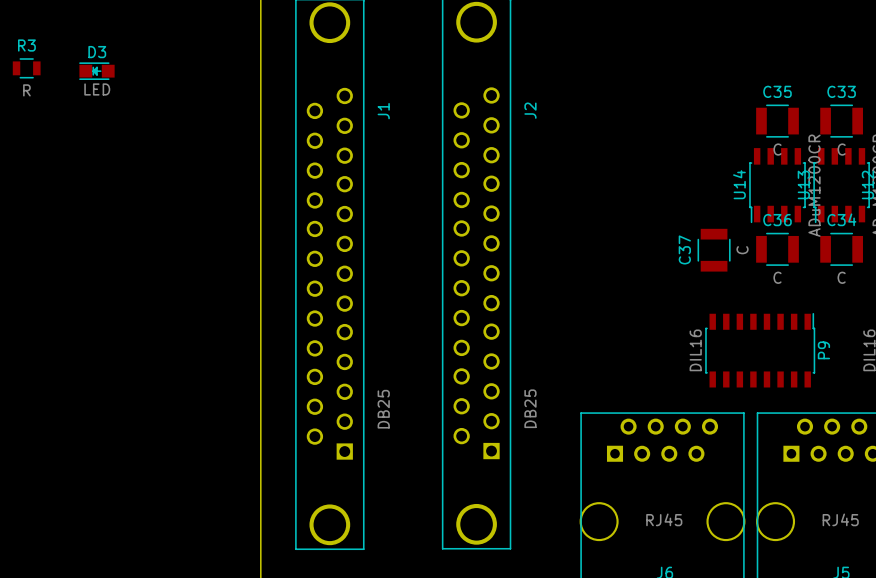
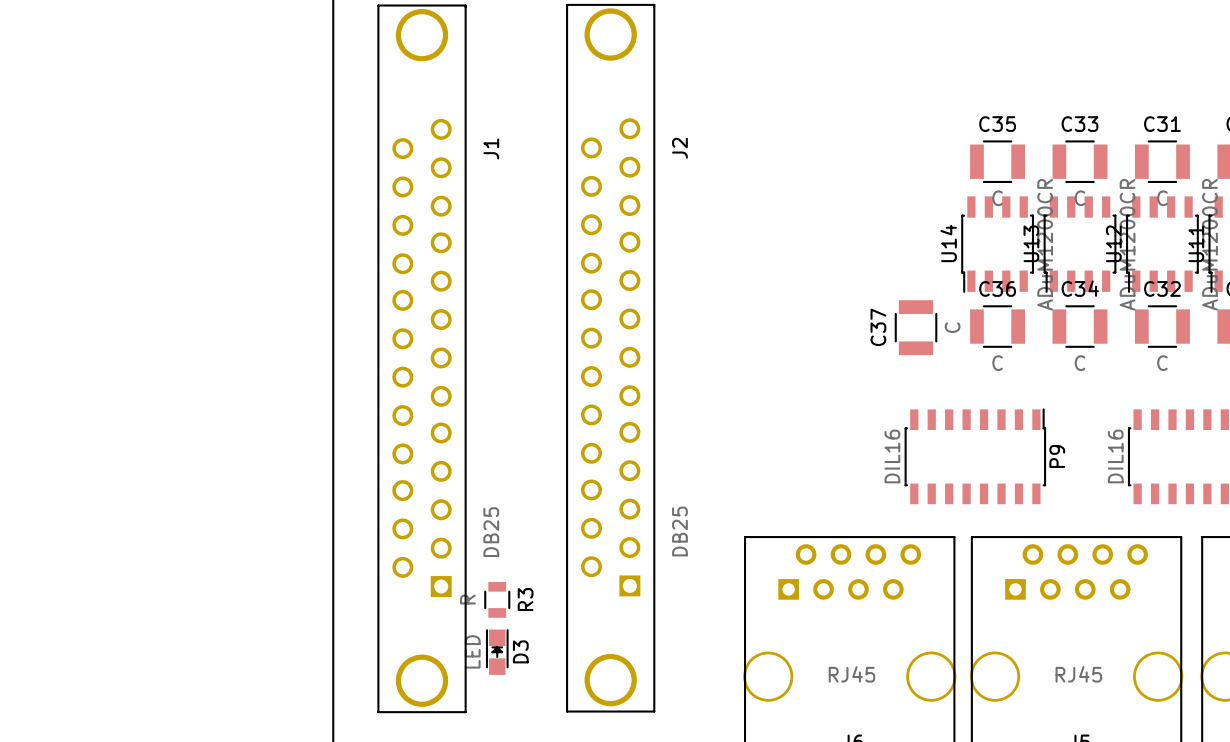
R3 rotation: 0° (26, 68) -> 90° clockwise (497, 599)
R3 position: (26, 68) -> (497, 599)
D3 rotation: 0° (96, 71) -> 90° clockwise (497, 652)
D3 position: (96, 71) -> (497, 652)

